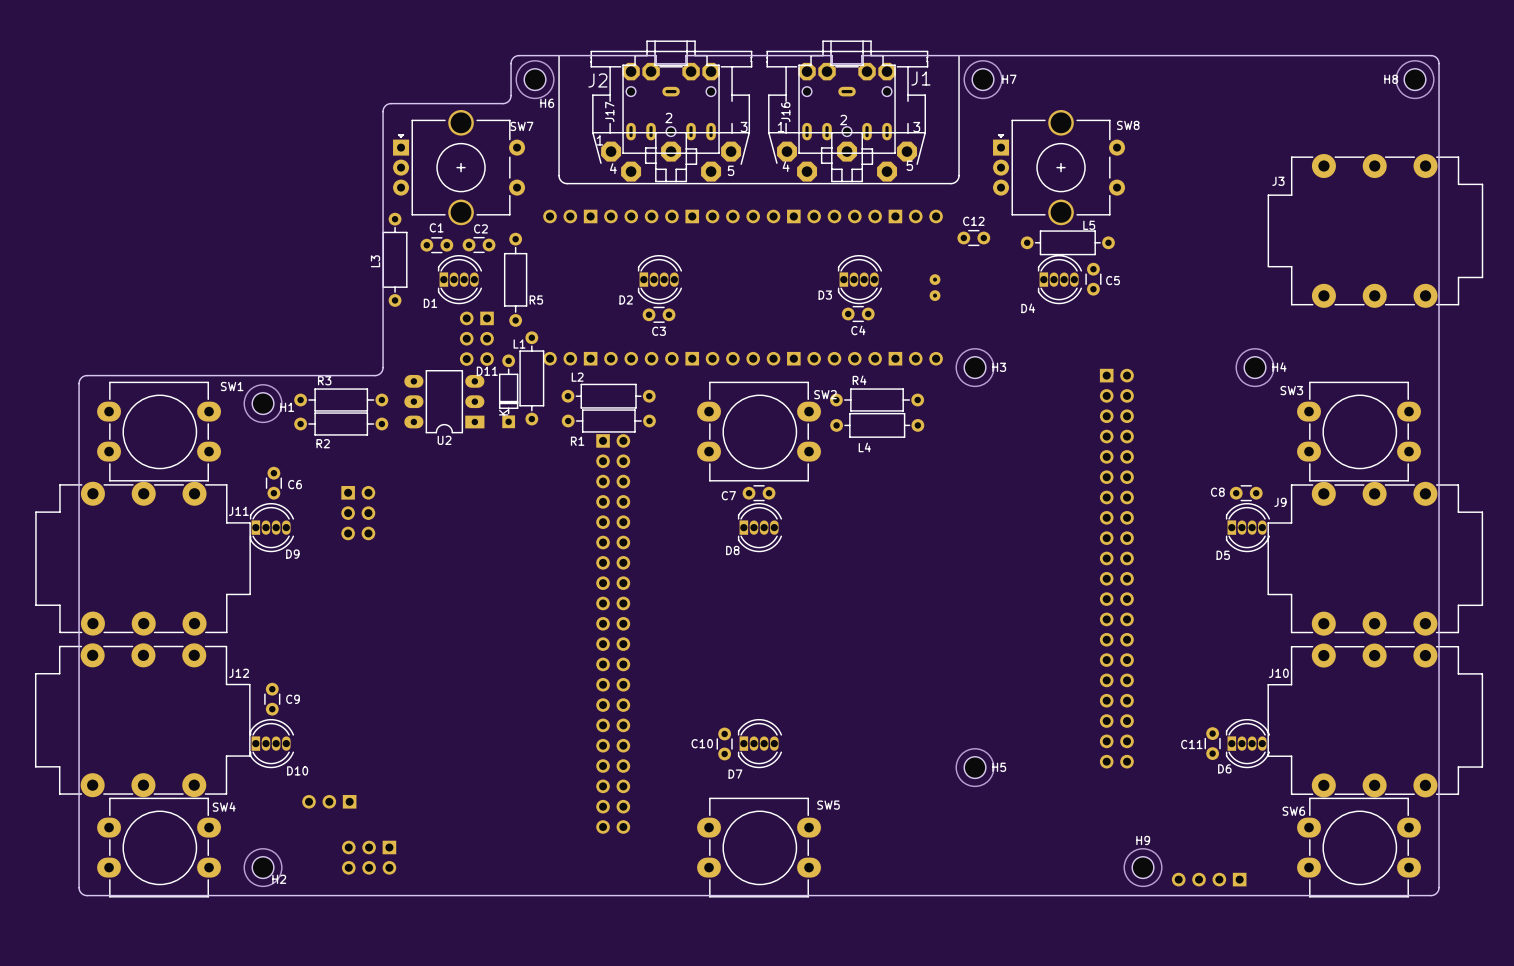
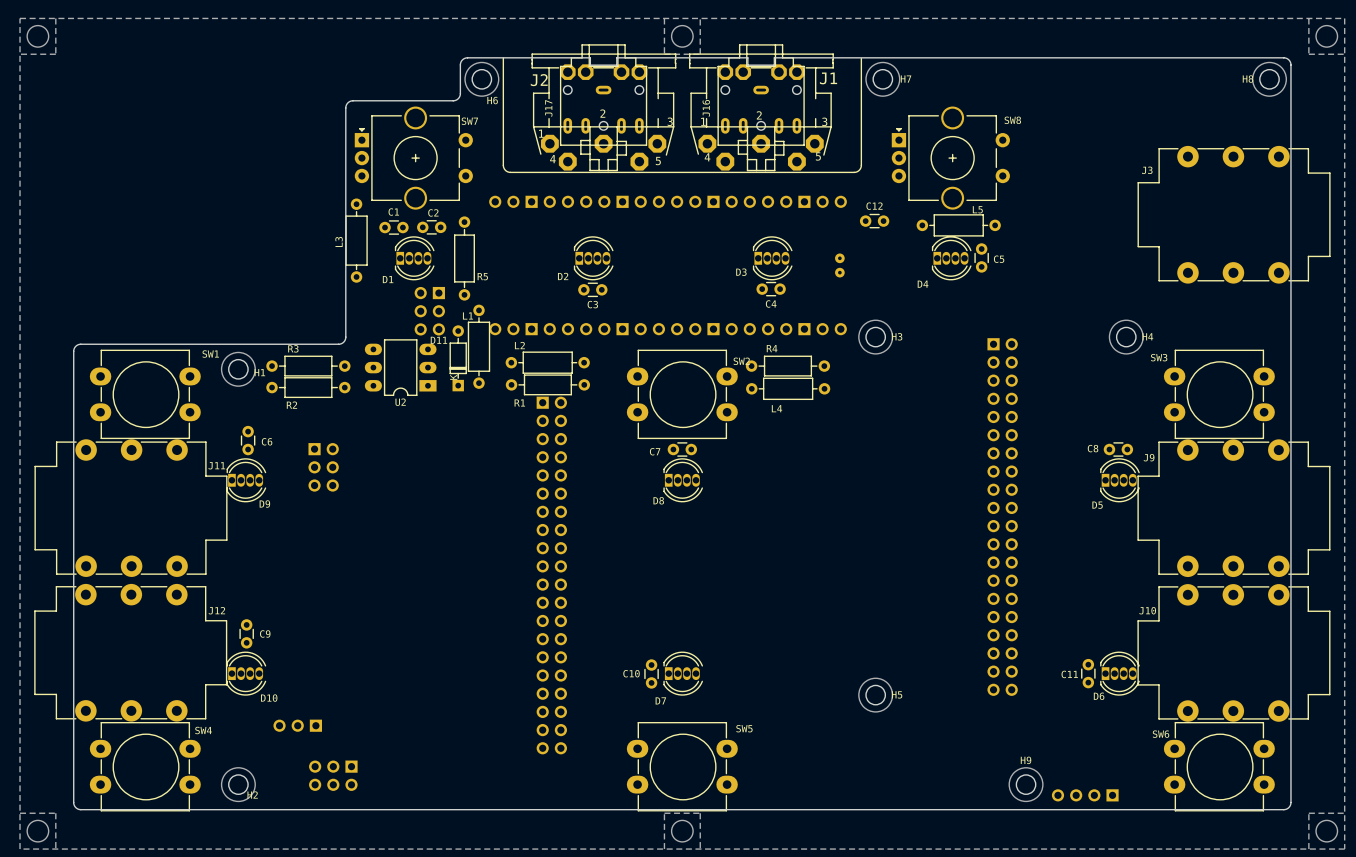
line: none -> (20, 18) (1344, 18) (1344, 849) (20, 849) (20, 18)
line: none -> (55, 18) (55, 54) (20, 54)
line: none -> (664, 18) (664, 54) (700, 54) (700, 18)
line: none -> (1308, 18) (1308, 54) (1344, 54)
drawing: none -> [26, 25, 49, 48]
drawing: none -> [671, 25, 694, 48]
drawing: none -> [1315, 25, 1338, 48]
line: none -> (20, 813) (55, 813) (55, 849)
line: none -> (1344, 813) (1308, 813) (1308, 849)
drawing: none -> [26, 820, 49, 843]
drawing: none -> [671, 820, 694, 843]
drawing: none -> [1315, 820, 1338, 843]
line: none -> (664, 849) (664, 813) (700, 813) (700, 849)

